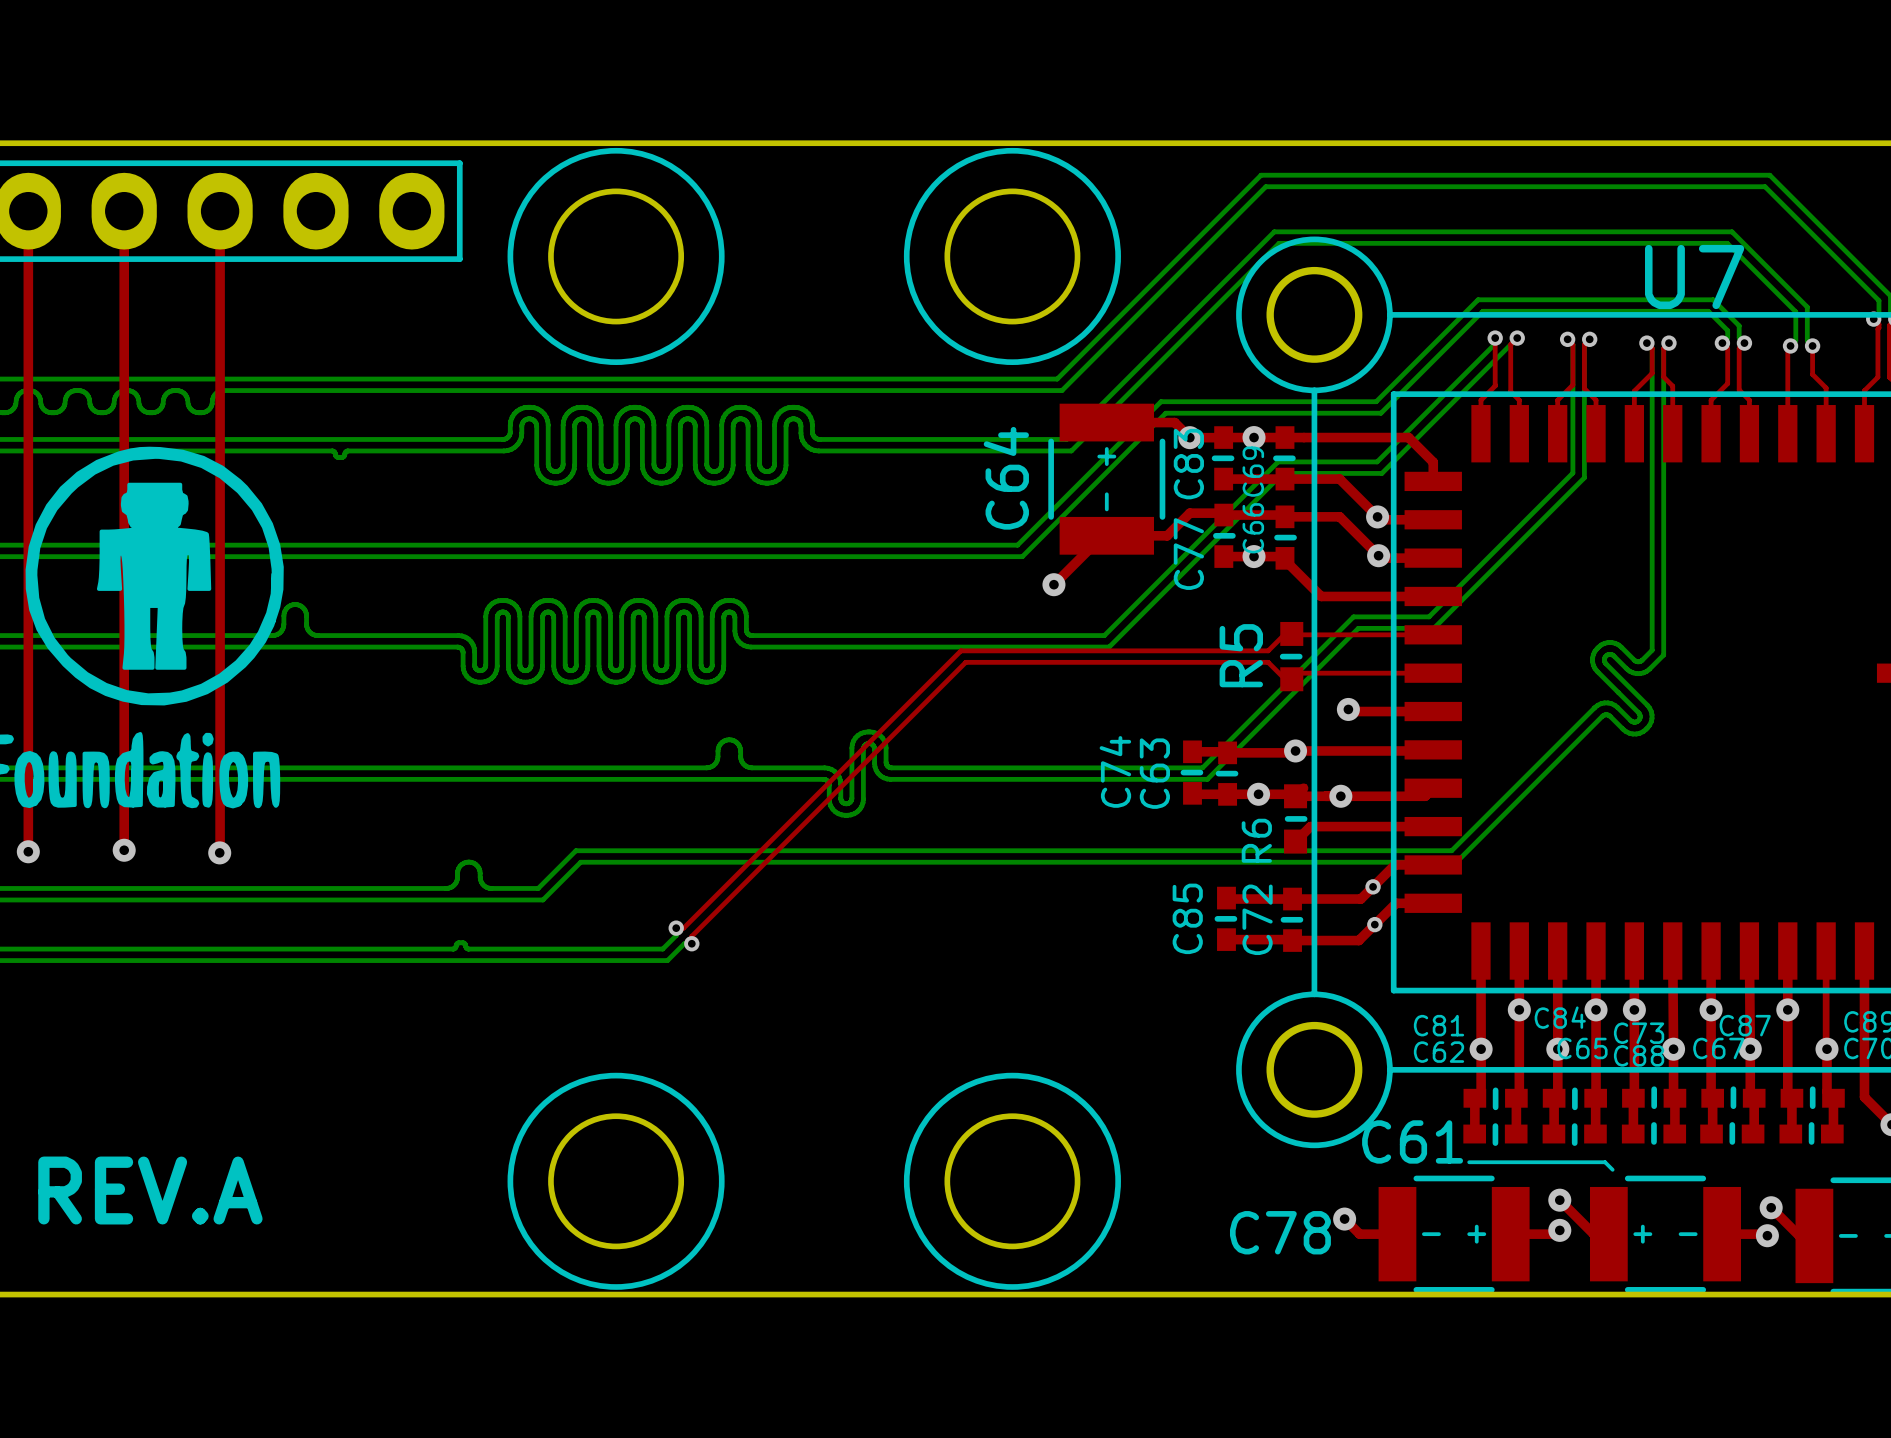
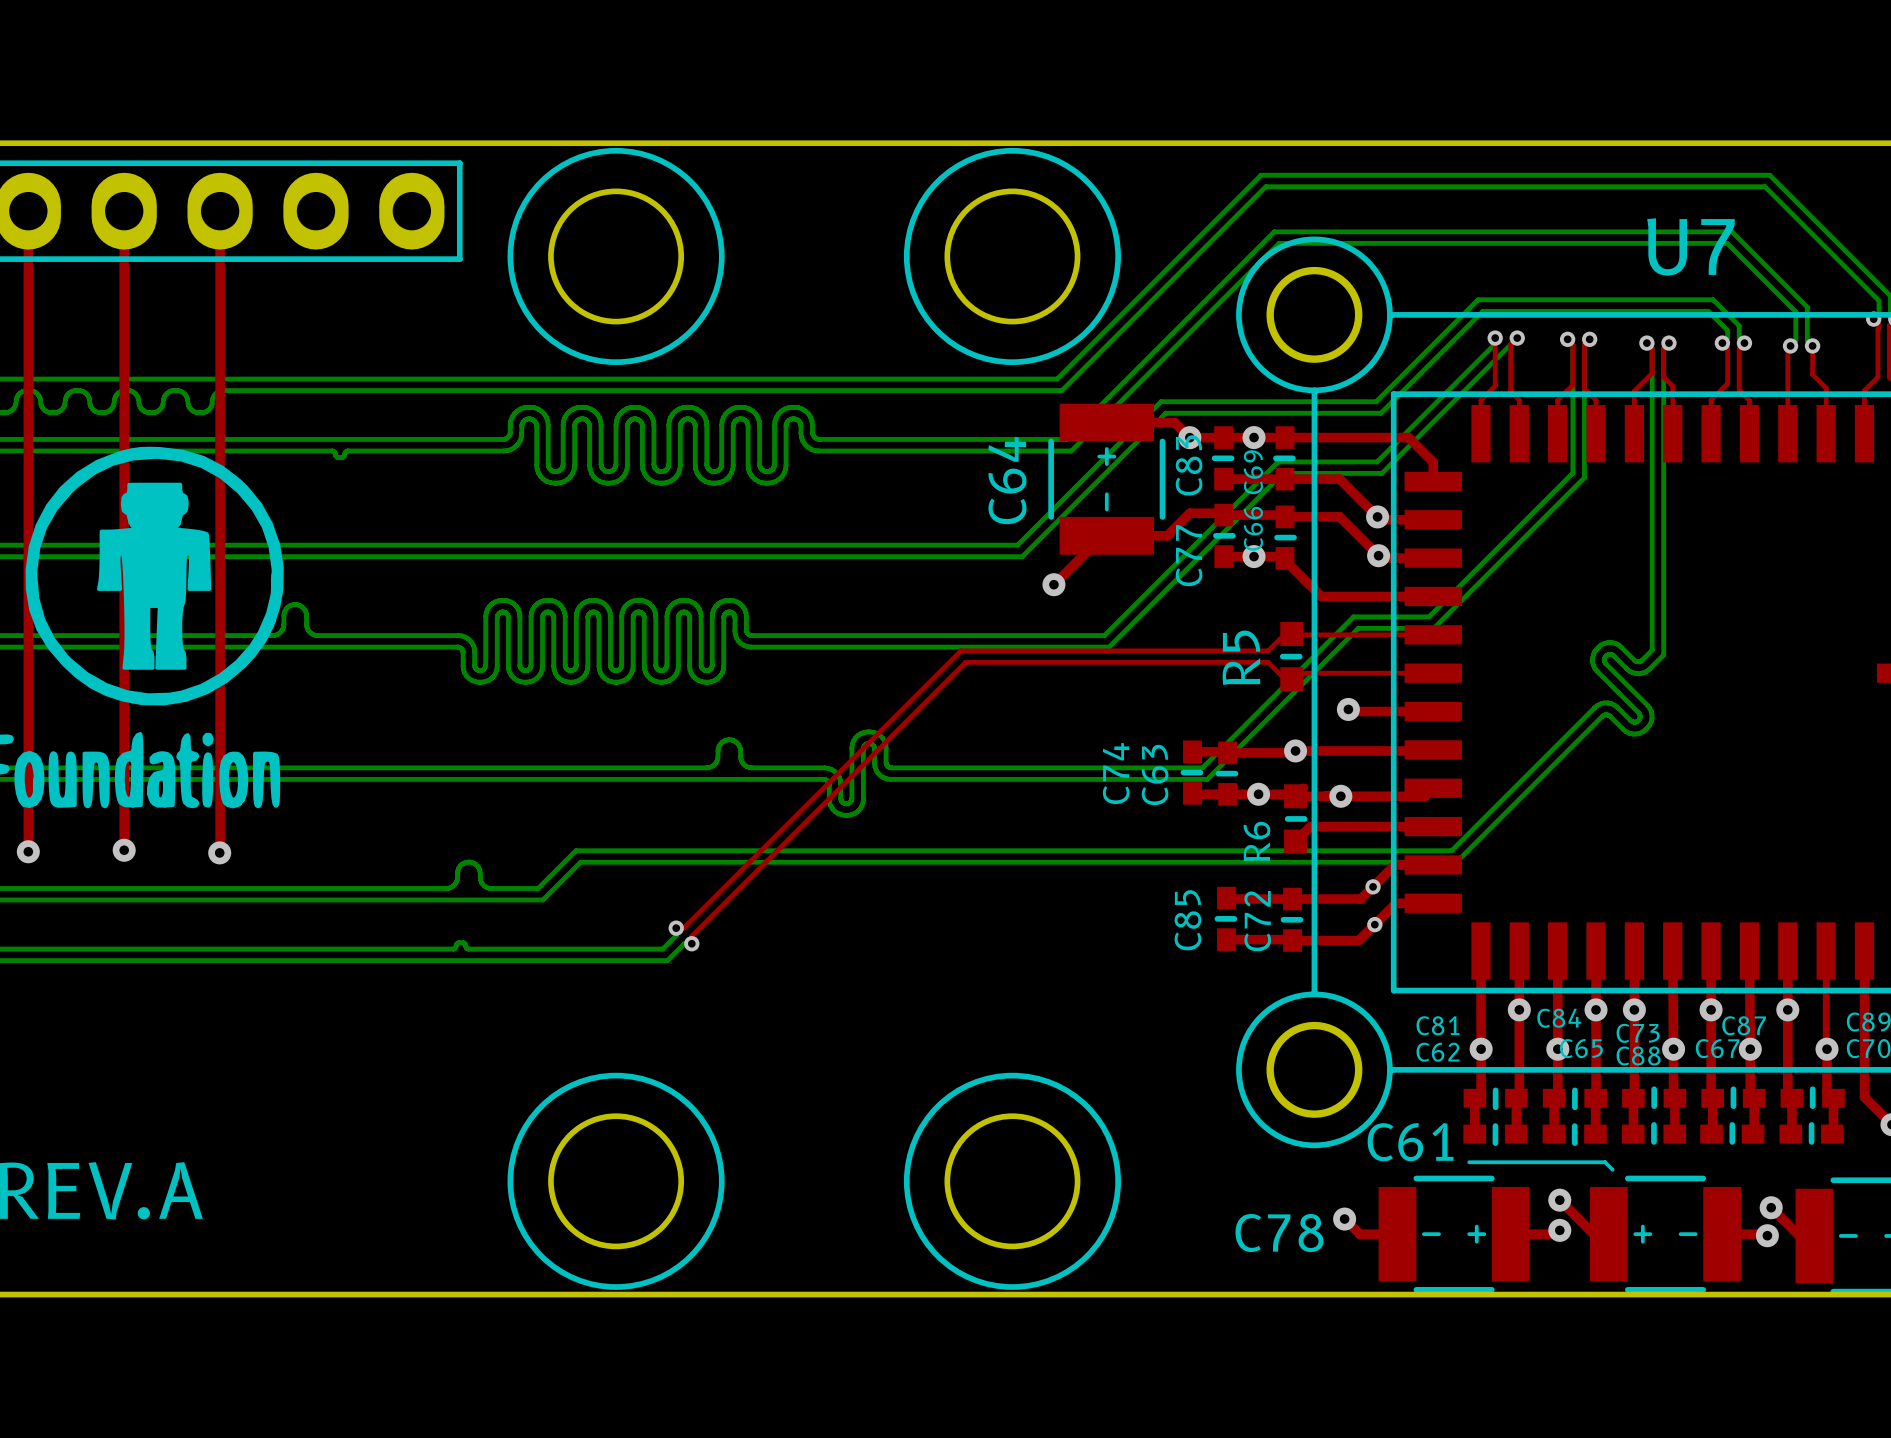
U7 name position: U7 (1694, 277) -> U7 (1690, 246)

